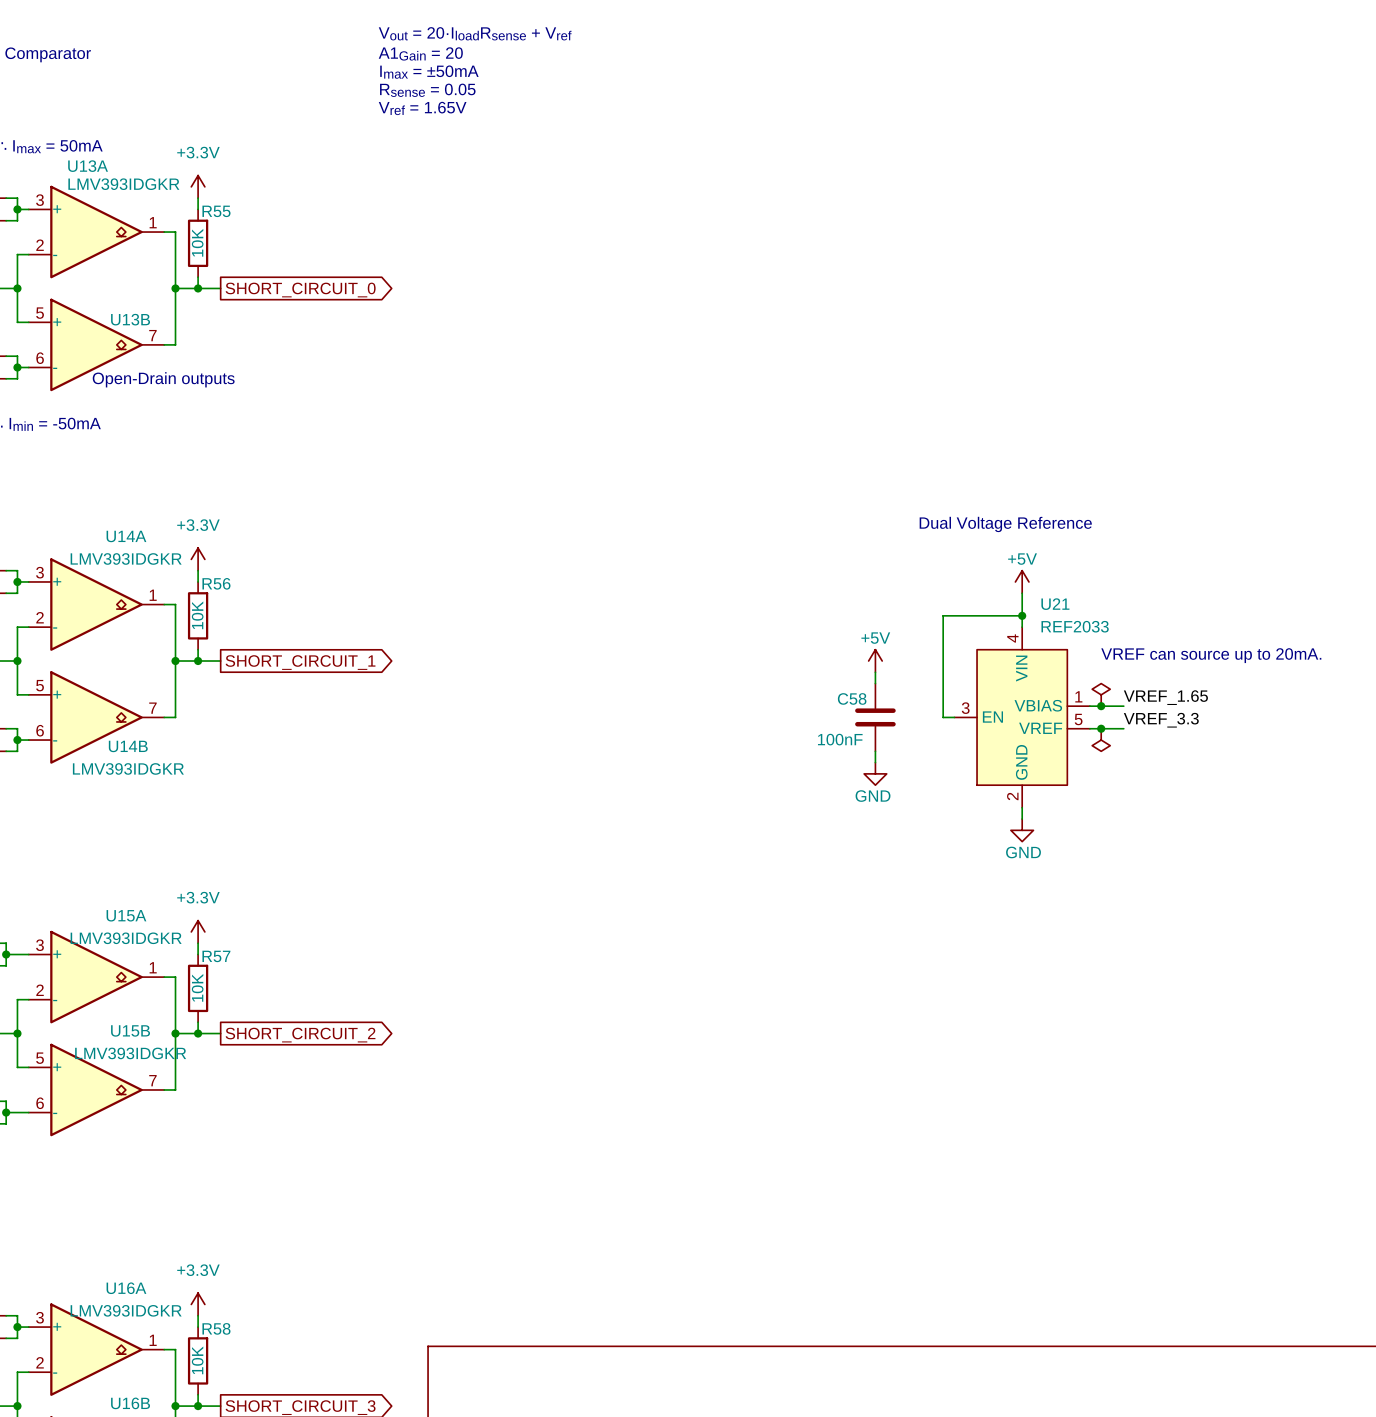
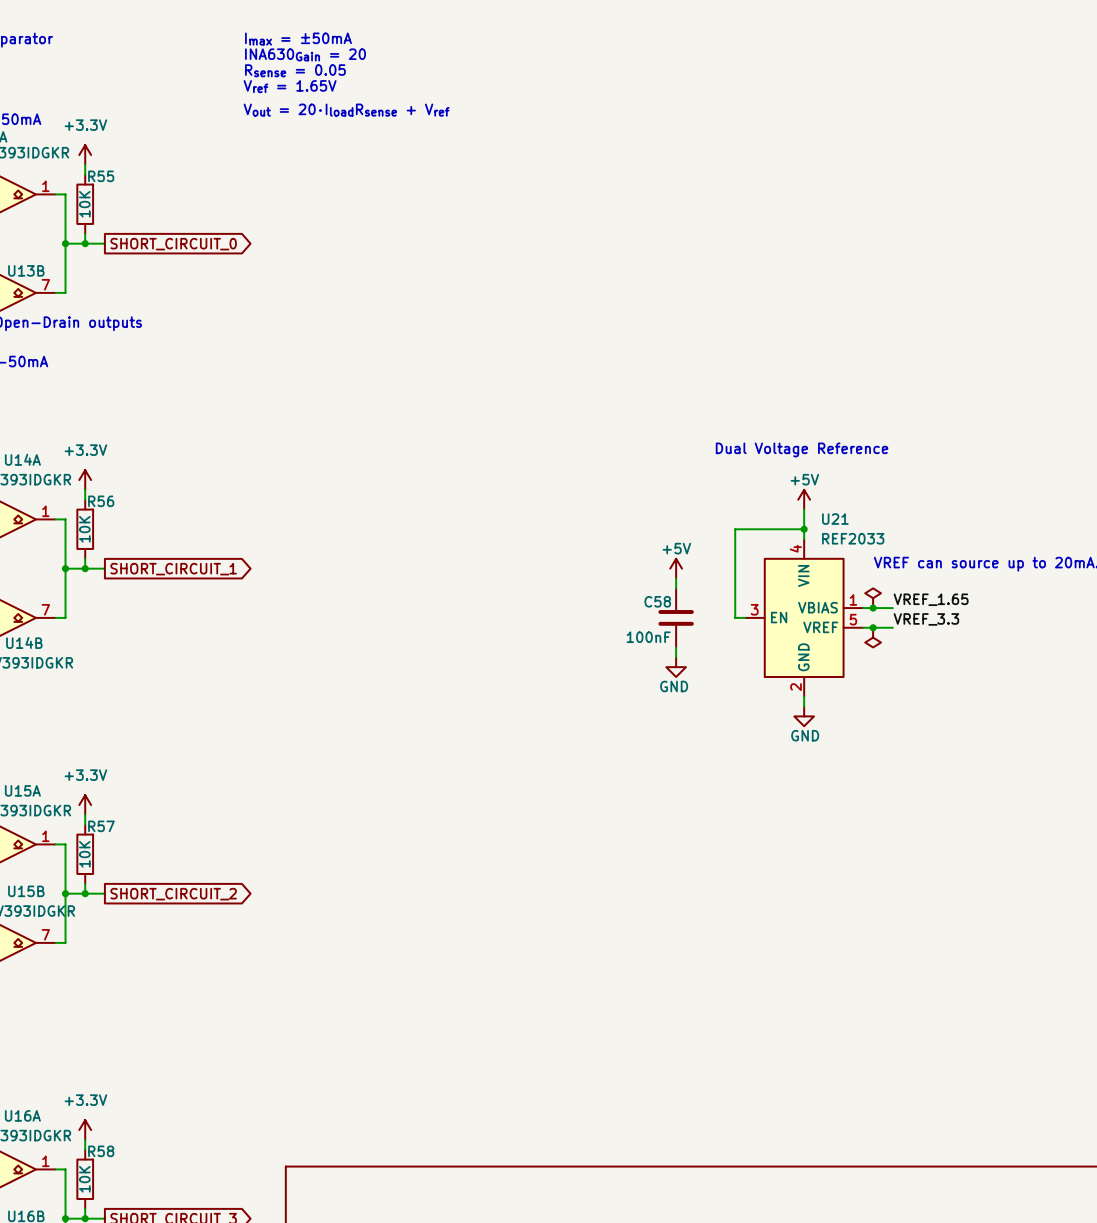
text position: Vout = 20·IloadRsense + Vref (475, 33) -> Vout = 20·IloadRsense + Vref (346, 110)
text: A1Gain = 20 (420, 53) -> Imax = ±50mA (298, 39)
text: Imax = ±50mA (429, 72) -> INA630Gain = 20 (305, 54)

